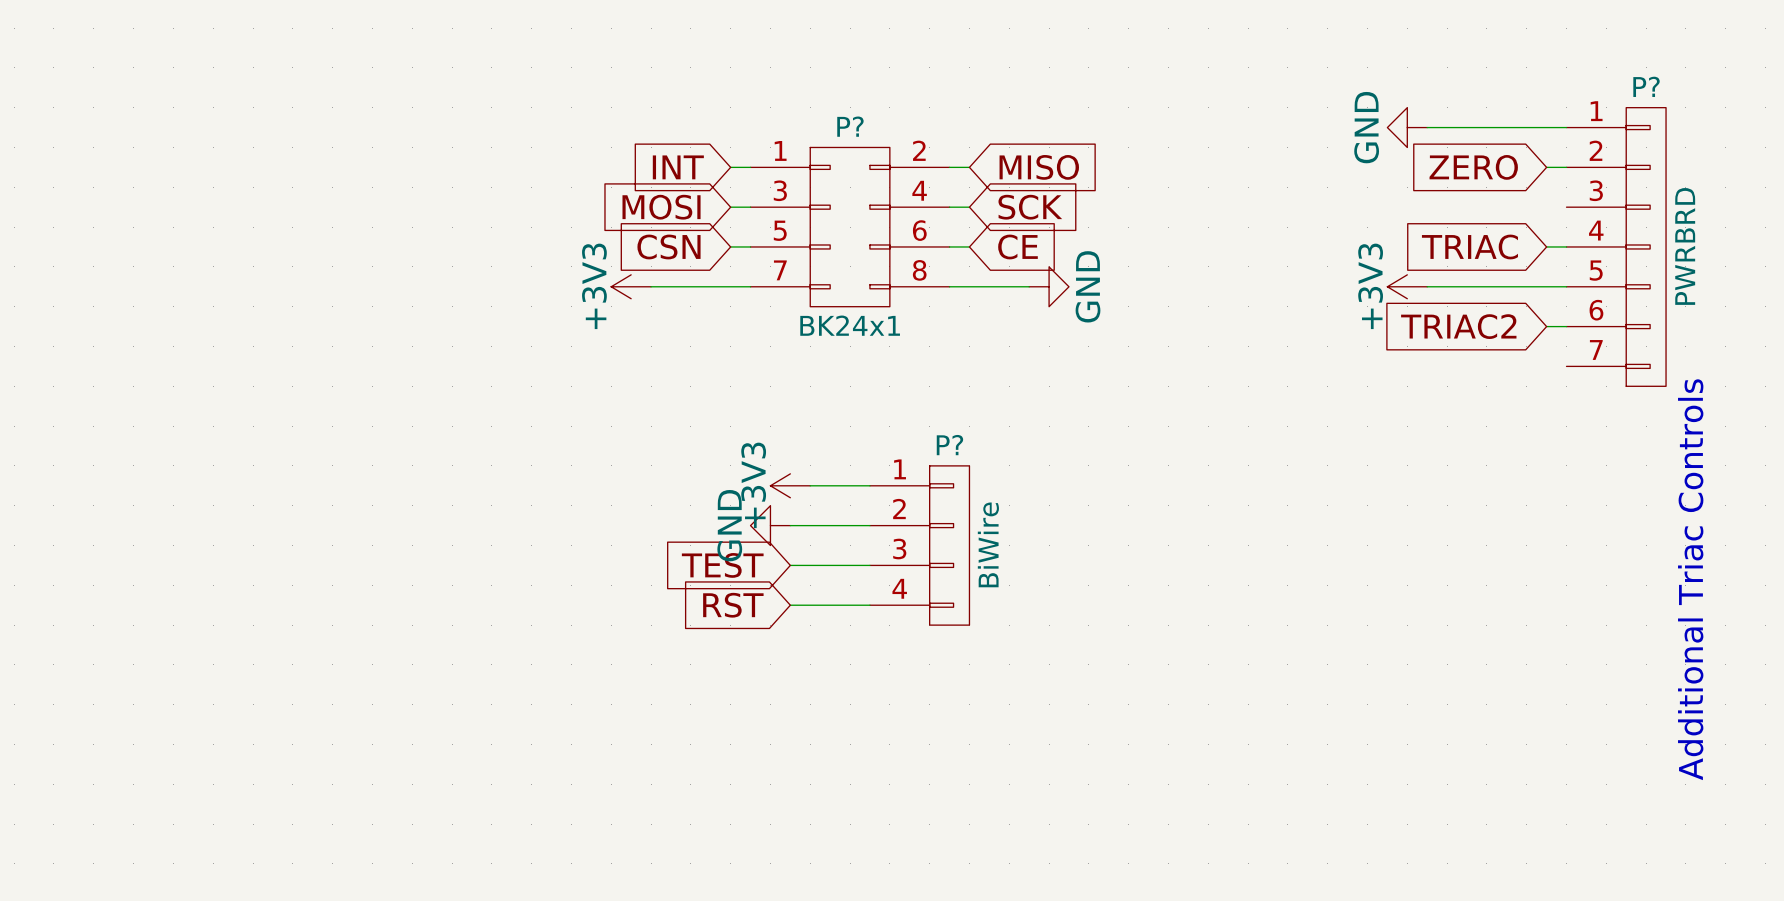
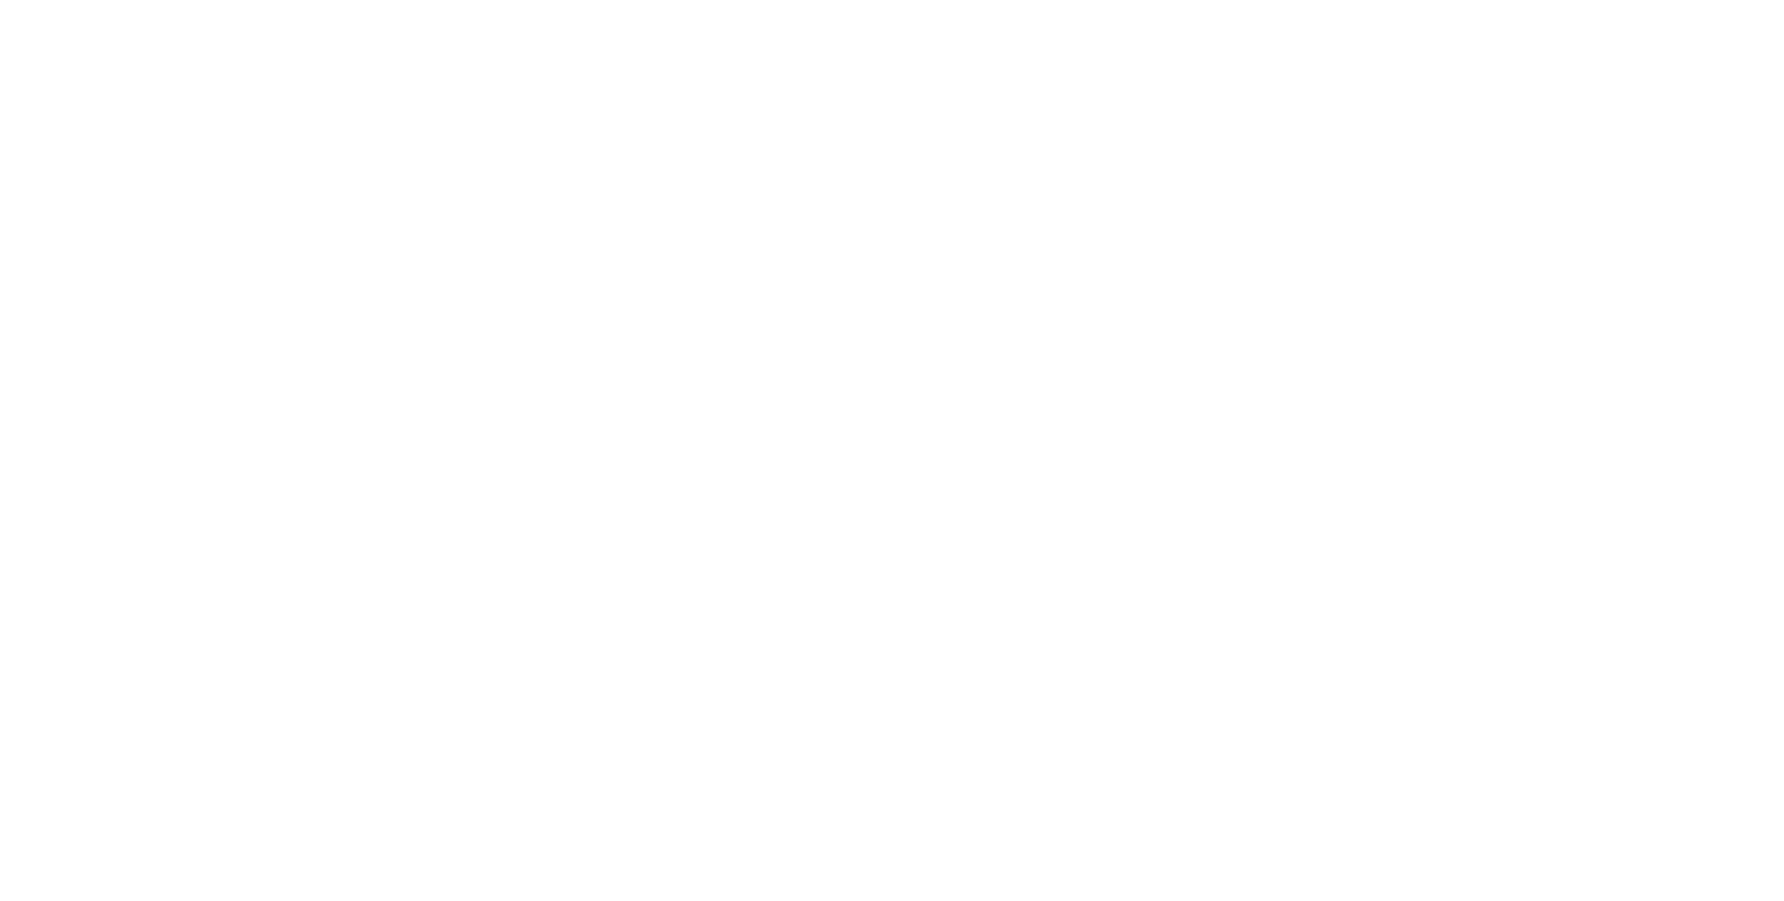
power symbol: GND (1407, 127) -> none
wire: (1427, 127) (1566, 127) -> none
global label: INT (678, 167) -> none
wire: (730, 167) (750, 167) -> none
wire: (949, 167) (969, 167) -> none
global label: MISO (1039, 167) -> none
global label: ZERO (1473, 167) -> none
wire: (1546, 167) (1566, 167) -> none
global label: MOSI (661, 207) -> none
wire: (730, 207) (750, 207) -> none
wire: (949, 207) (969, 207) -> none
global label: SCK (1030, 207) -> none
P?: BK24x1 (850, 227) -> none
wire: (730, 246) (750, 246) -> none
wire: (949, 246) (969, 246) -> none
wire: (1546, 246) (1566, 246) -> none
P?: PWRBRD (1616, 246) -> none
global label: CSN (669, 247) -> none
global label: CE (1017, 247) -> none
global label: TRIAC (1469, 247) -> none
power symbol: +3V3 (631, 286) -> none
wire: (651, 286) (750, 286) -> none
wire: (949, 286) (1029, 286) -> none
power symbol: GND (1049, 286) -> none
power symbol: +3V3 (1407, 286) -> none
wire: (1427, 286) (1566, 286) -> none
global label: TRIAC2 (1458, 326) -> none
wire: (1546, 326) (1566, 326) -> none
power symbol: +3V3 (790, 485) -> none
wire: (810, 485) (869, 485) -> none
power symbol: GND (770, 525) -> none
wire: (790, 525) (869, 525) -> none
P?: BiWire (919, 545) -> none
global label: TEST (722, 565) -> none
wire: (790, 565) (869, 565) -> none
text: Additional Triac Controls (1690, 579) -> none
global label: RST (733, 605) -> none
wire: (790, 605) (869, 605) -> none

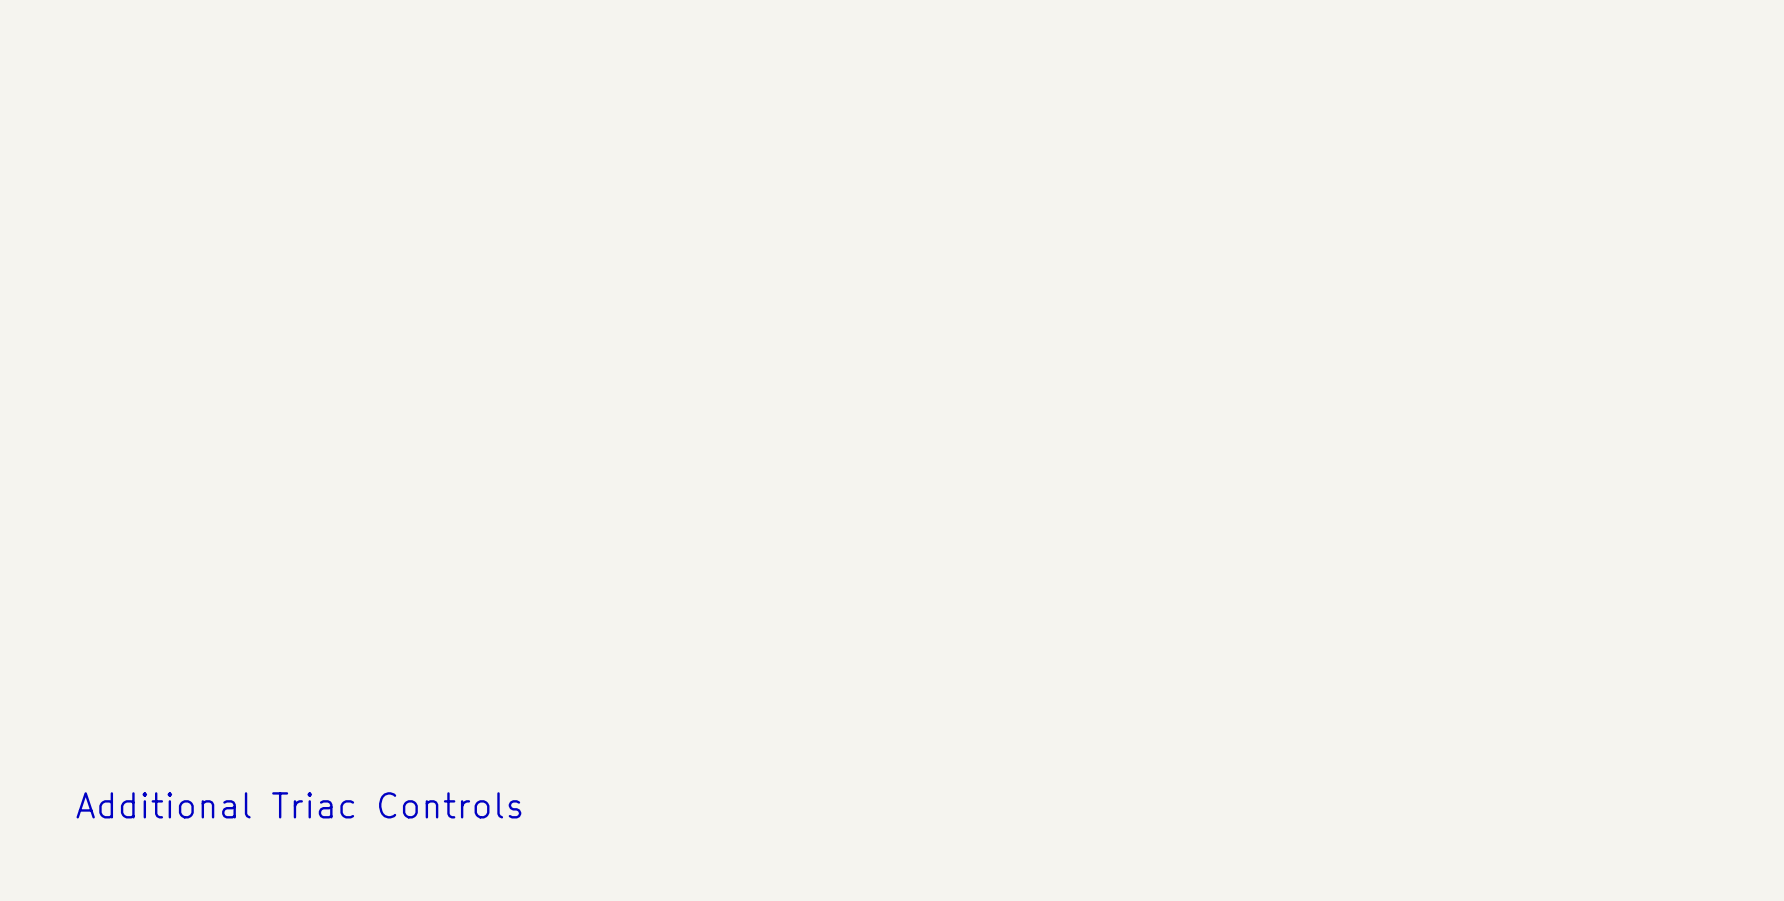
text: none -> Additional Triac Controls (298, 805)

